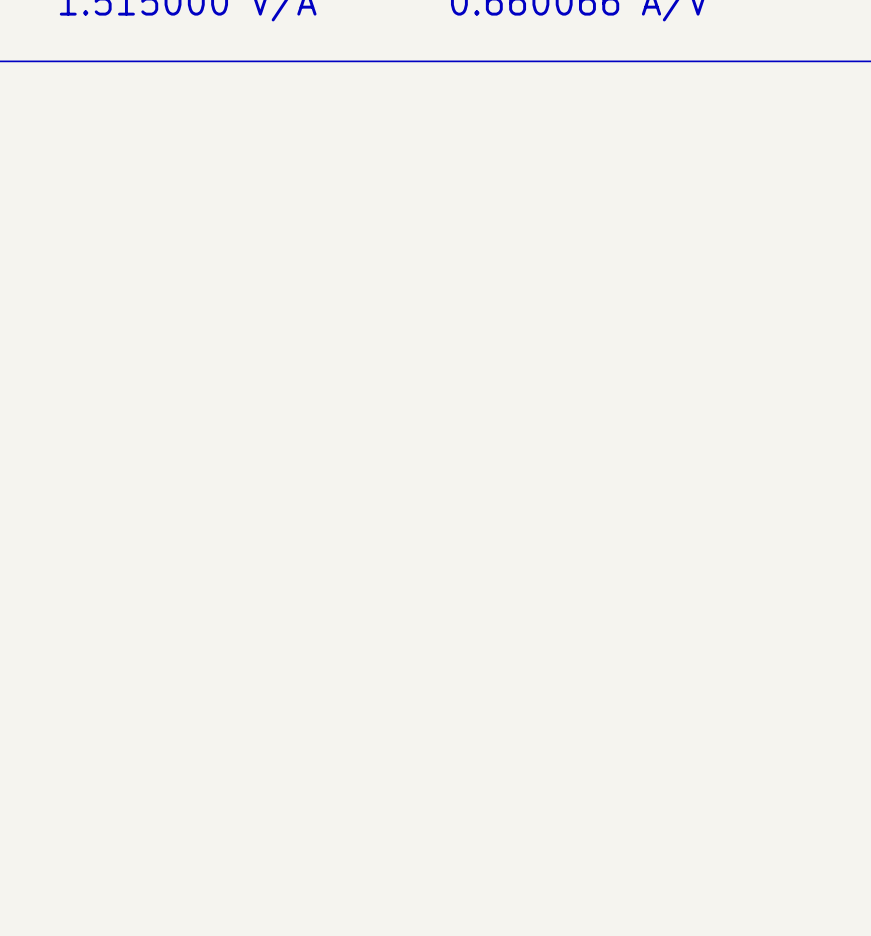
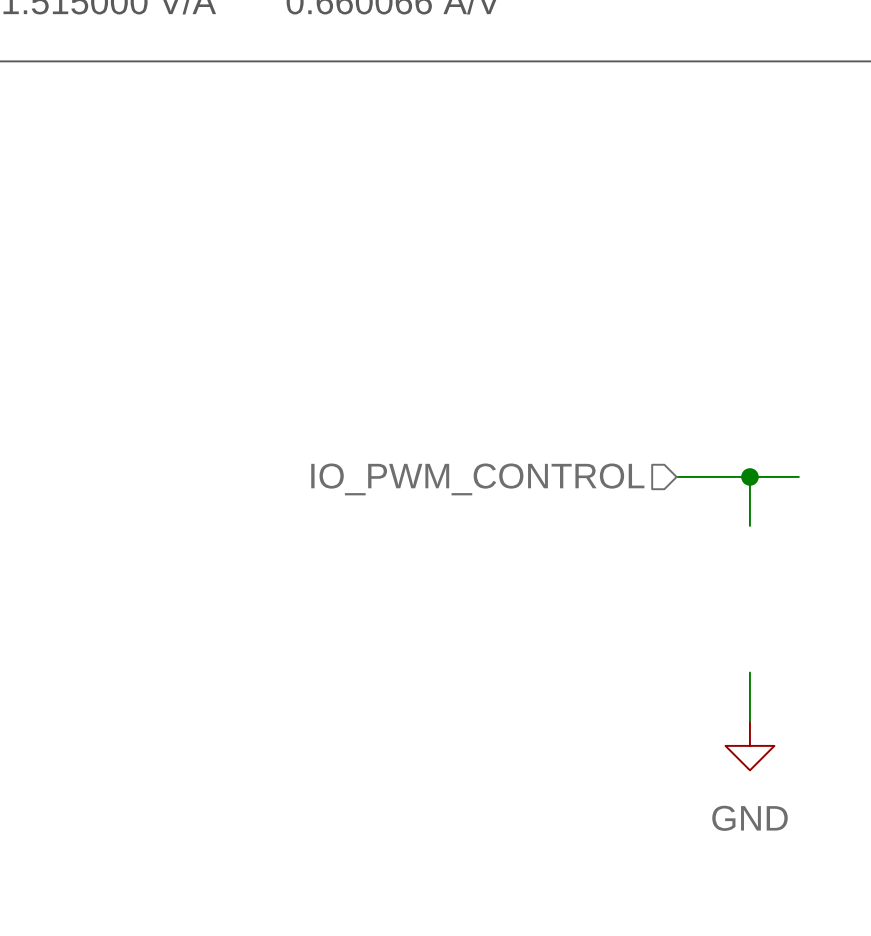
wire: none -> (676, 476) (798, 476)
wire: none -> (749, 476) (749, 525)
junction: none -> (749, 476)
hierarchical label: none -> IO_PWM_CONTROL (477, 479)
wire: none -> (749, 672) (749, 721)
power symbol: none -> GND (749, 745)

